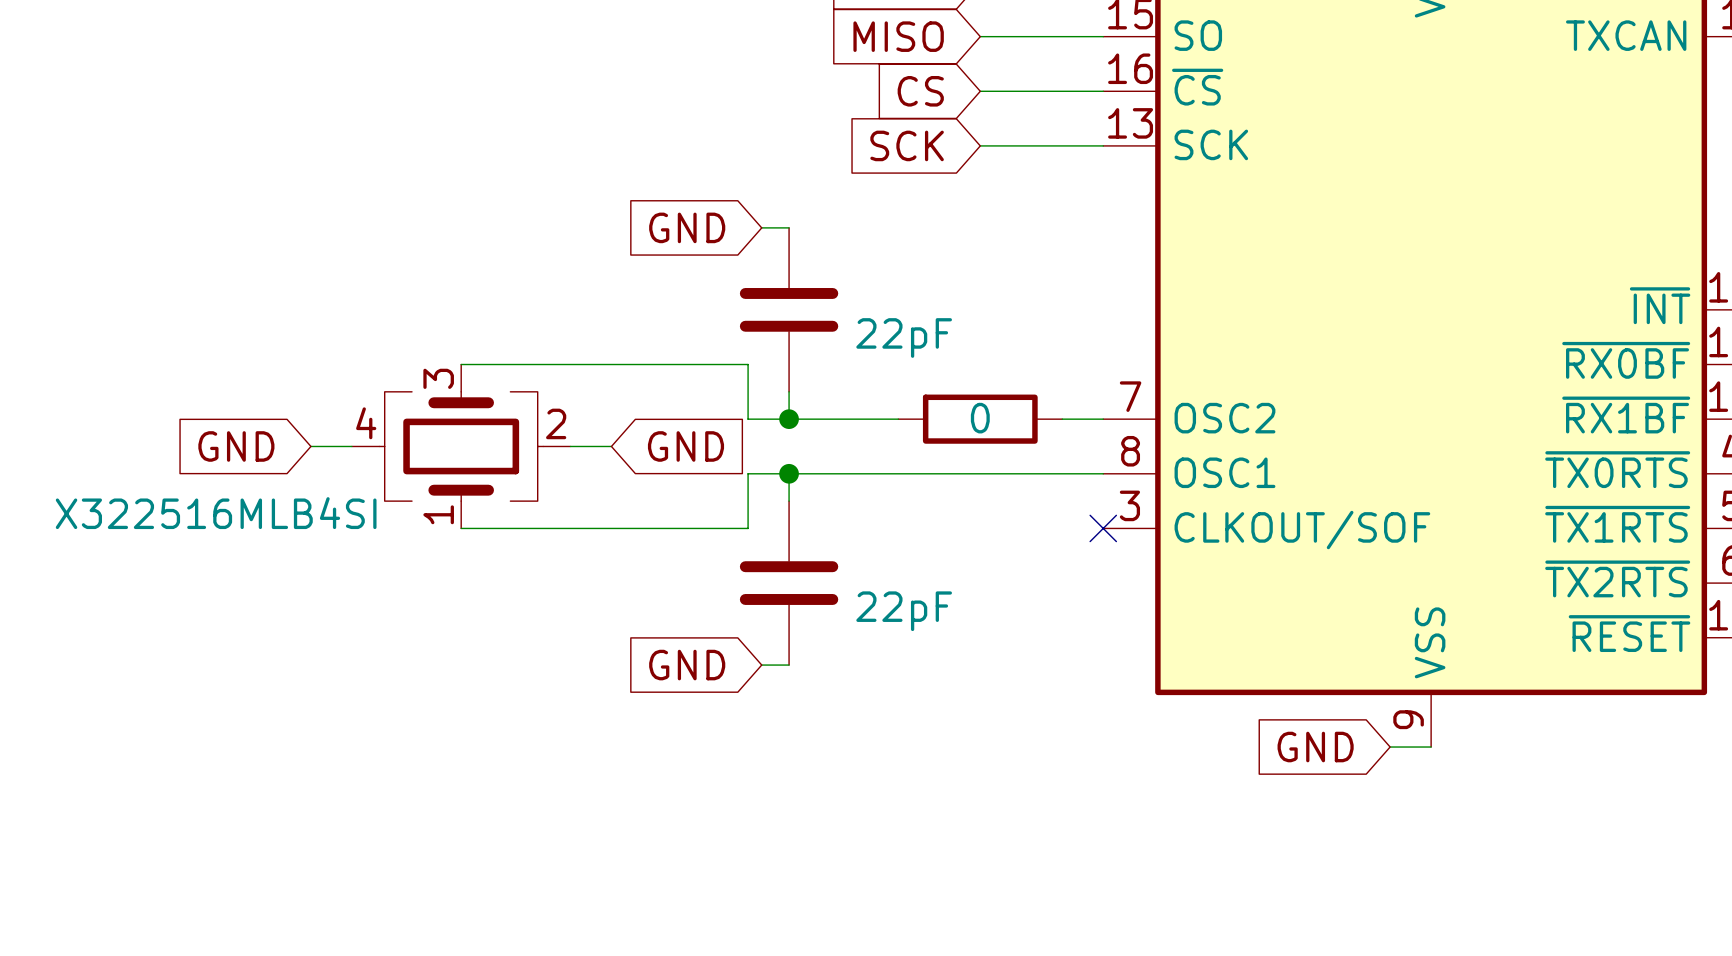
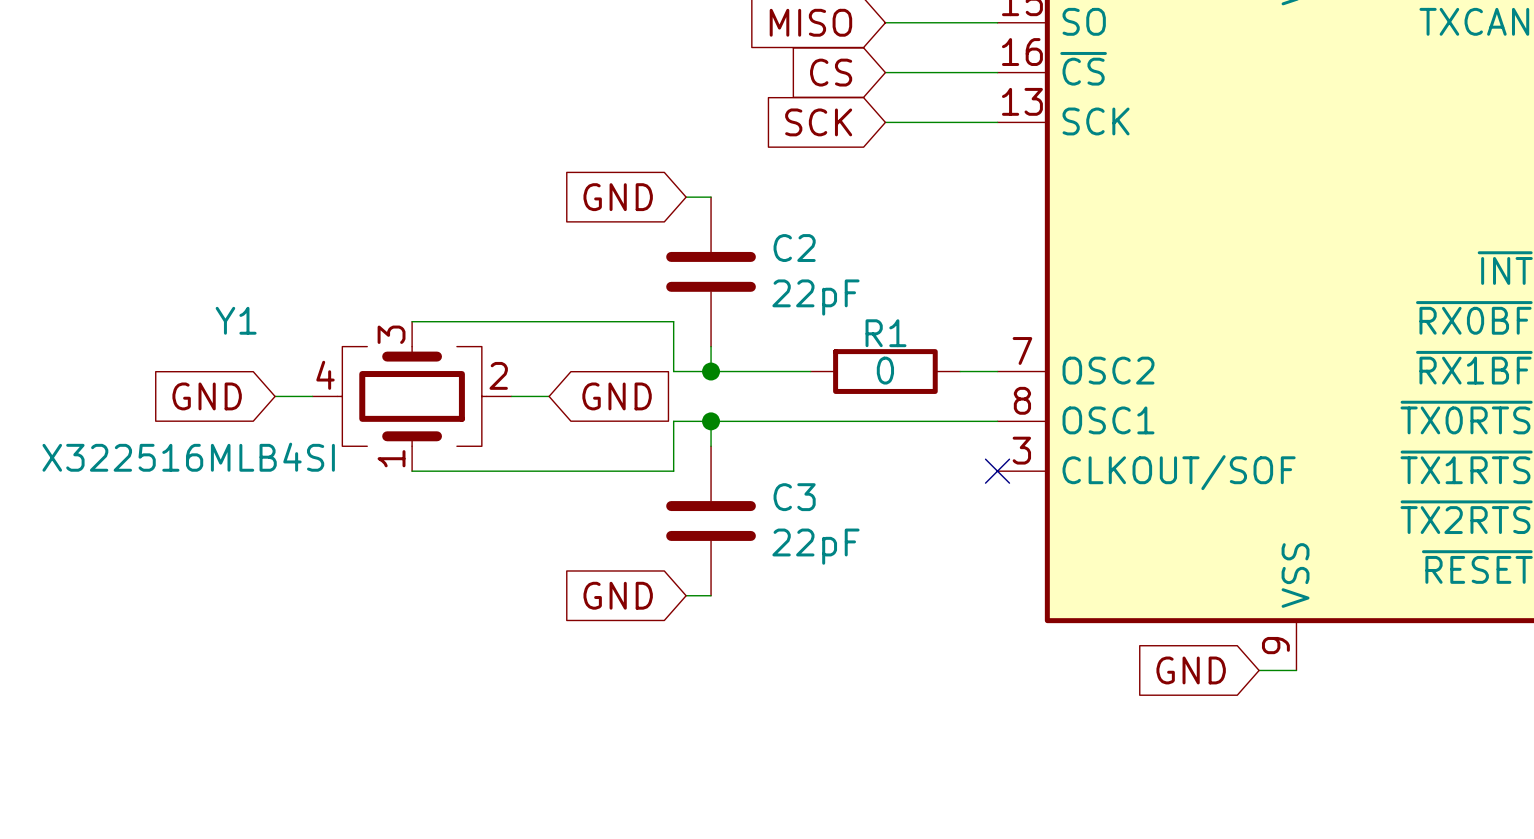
C2 name: none -> C2 (794, 248)
Y1 name: none -> Y1 (236, 320)
R1 name: none -> R1 (886, 333)
C3 name: none -> C3 (794, 497)

